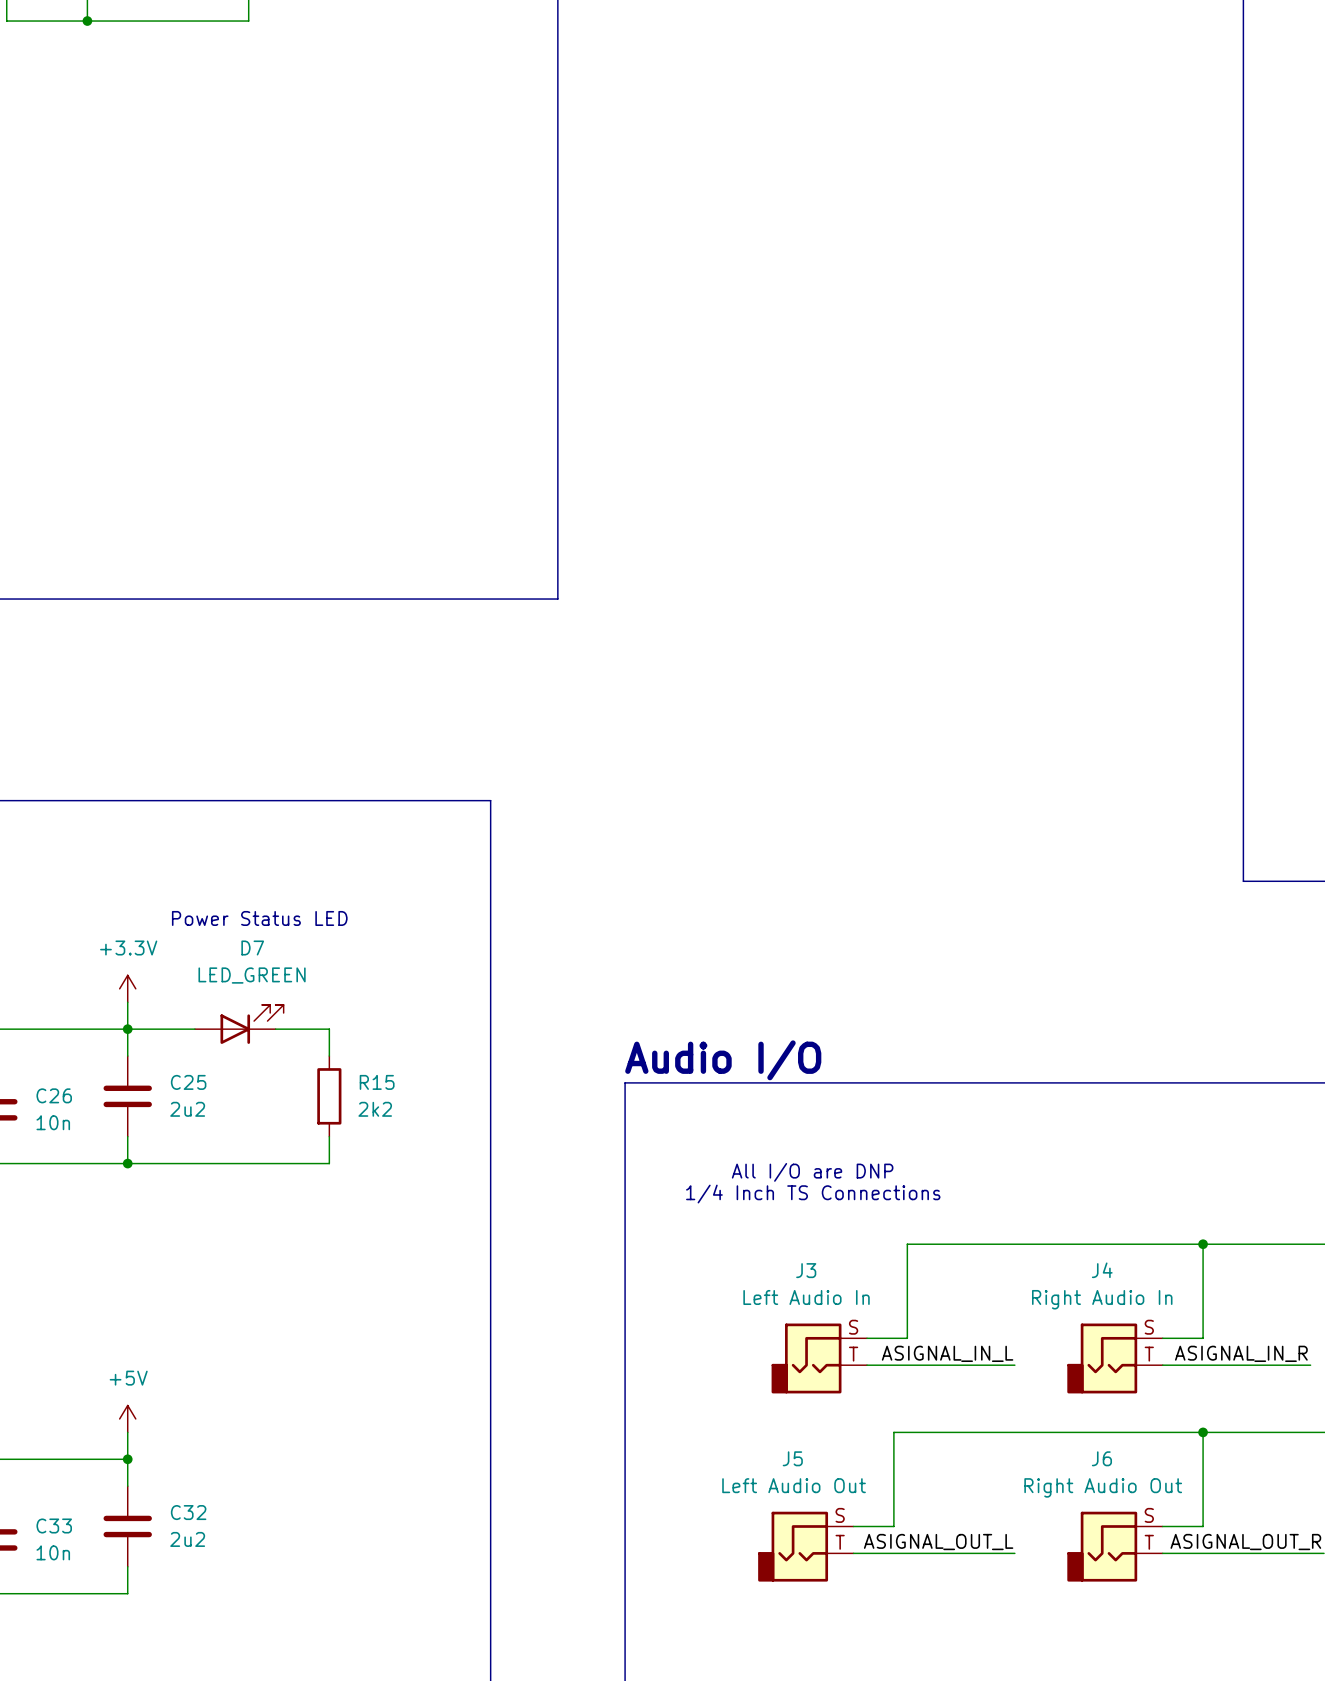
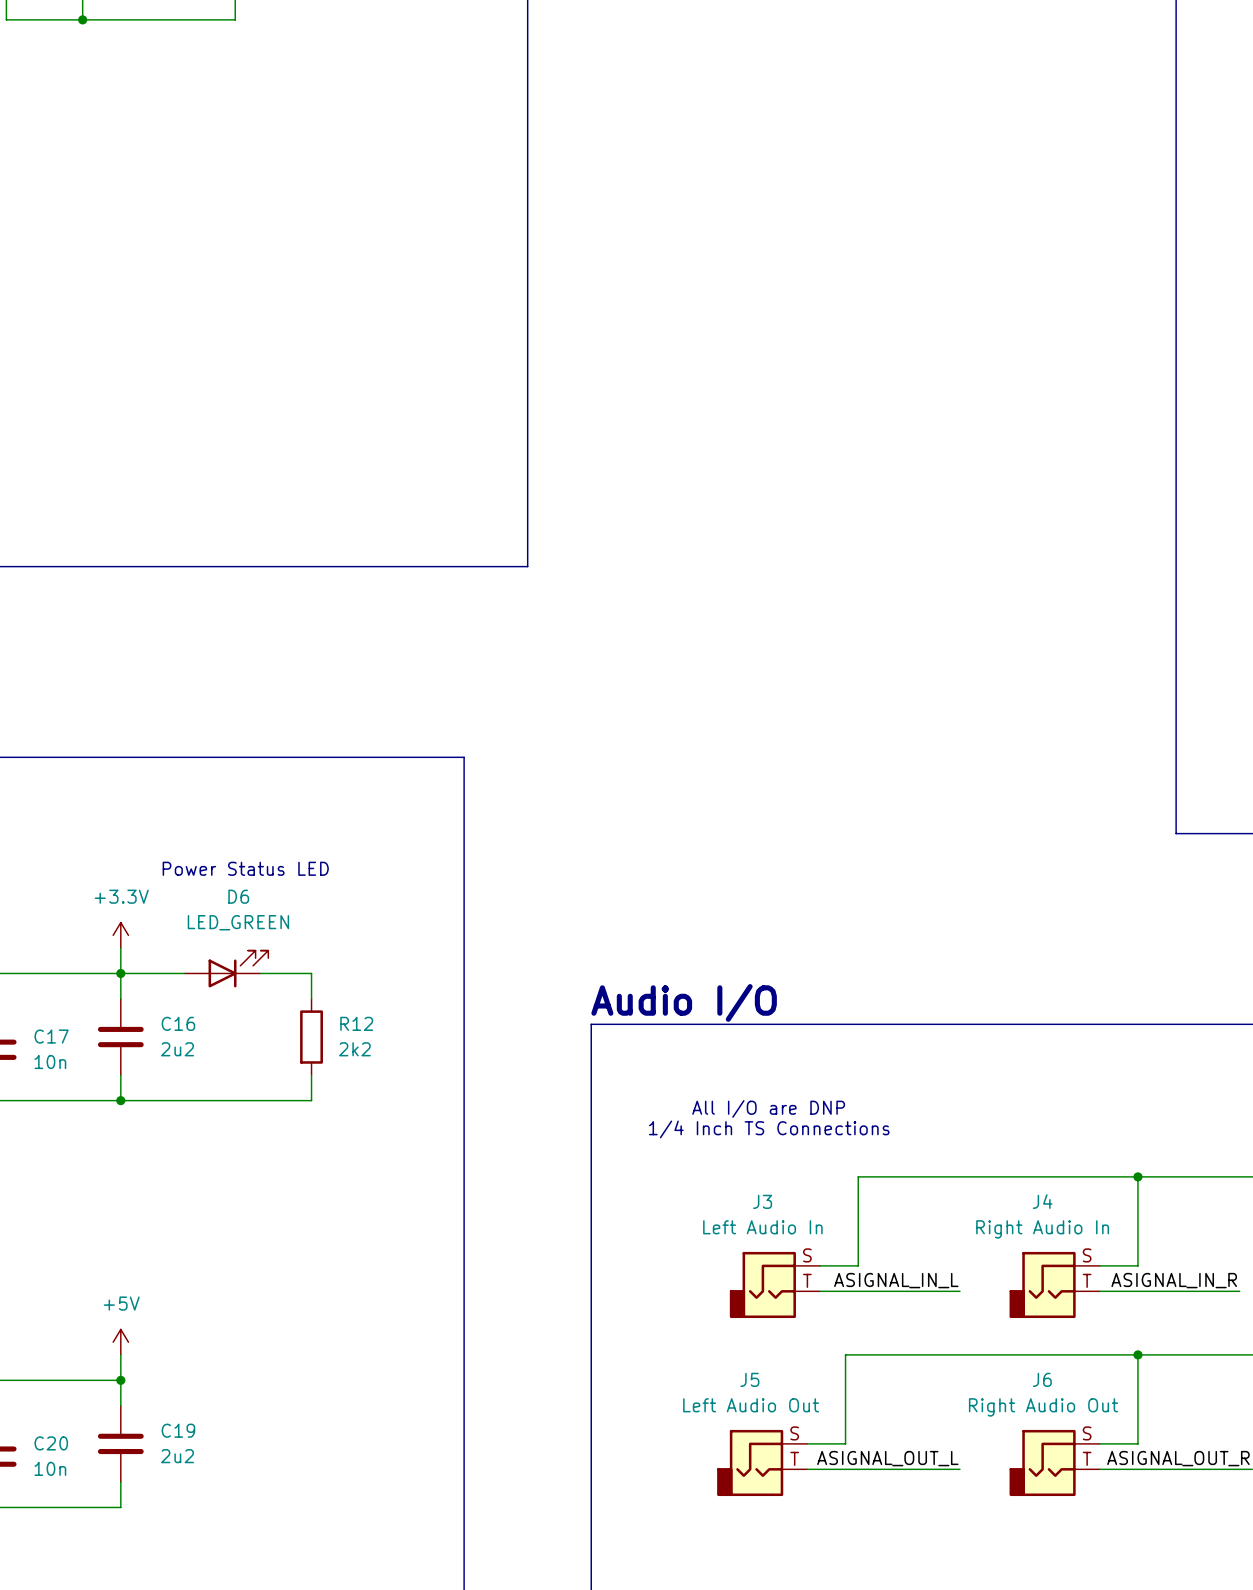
D7 name: D7 (252, 948) -> D6 (238, 896)
C25 name: C25 (188, 1082) -> C16 (178, 1023)
R15 name: R15 (377, 1082) -> R12 (356, 1023)
C26 name: C26 (54, 1095) -> C17 (51, 1036)
C32 name: C32 (188, 1512) -> C19 (178, 1430)
C33 name: C33 (54, 1525) -> C20 (51, 1443)

